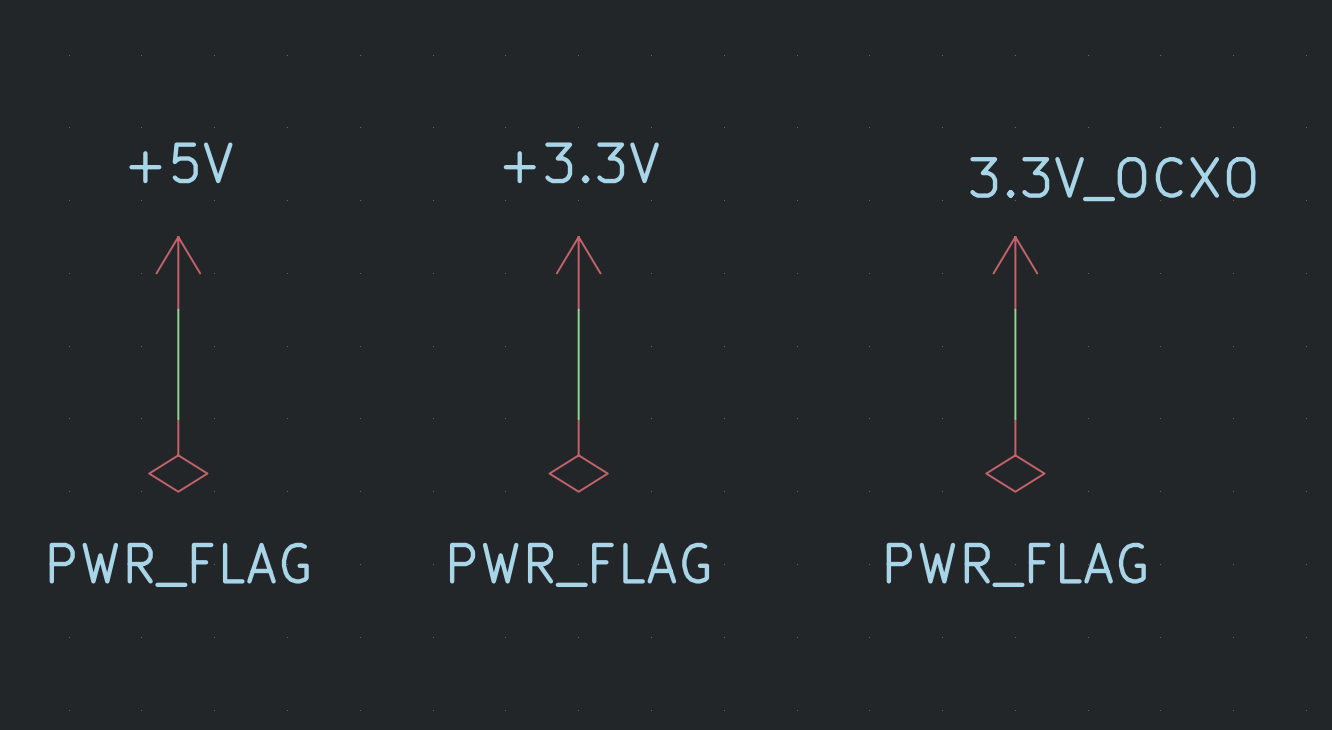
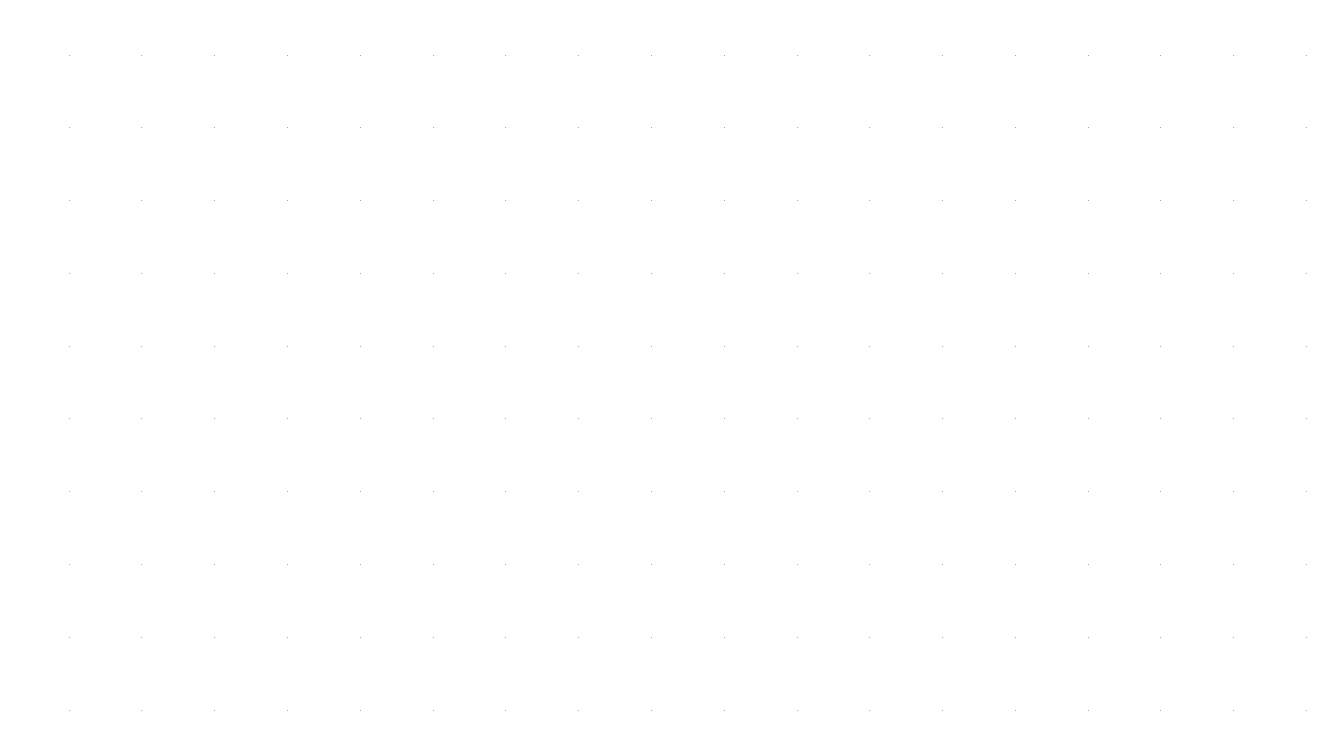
power symbol: +5V (178, 273) -> none
power symbol: +3.3V (578, 273) -> none
power symbol: 3.3V_OCXO (1015, 273) -> none
wire: (178, 309) (178, 418) -> none
wire: (578, 309) (578, 418) -> none
wire: (1015, 309) (1015, 418) -> none
power symbol: PWR_FLAG (178, 455) -> none
power symbol: PWR_FLAG (578, 455) -> none
power symbol: PWR_FLAG (1015, 455) -> none

